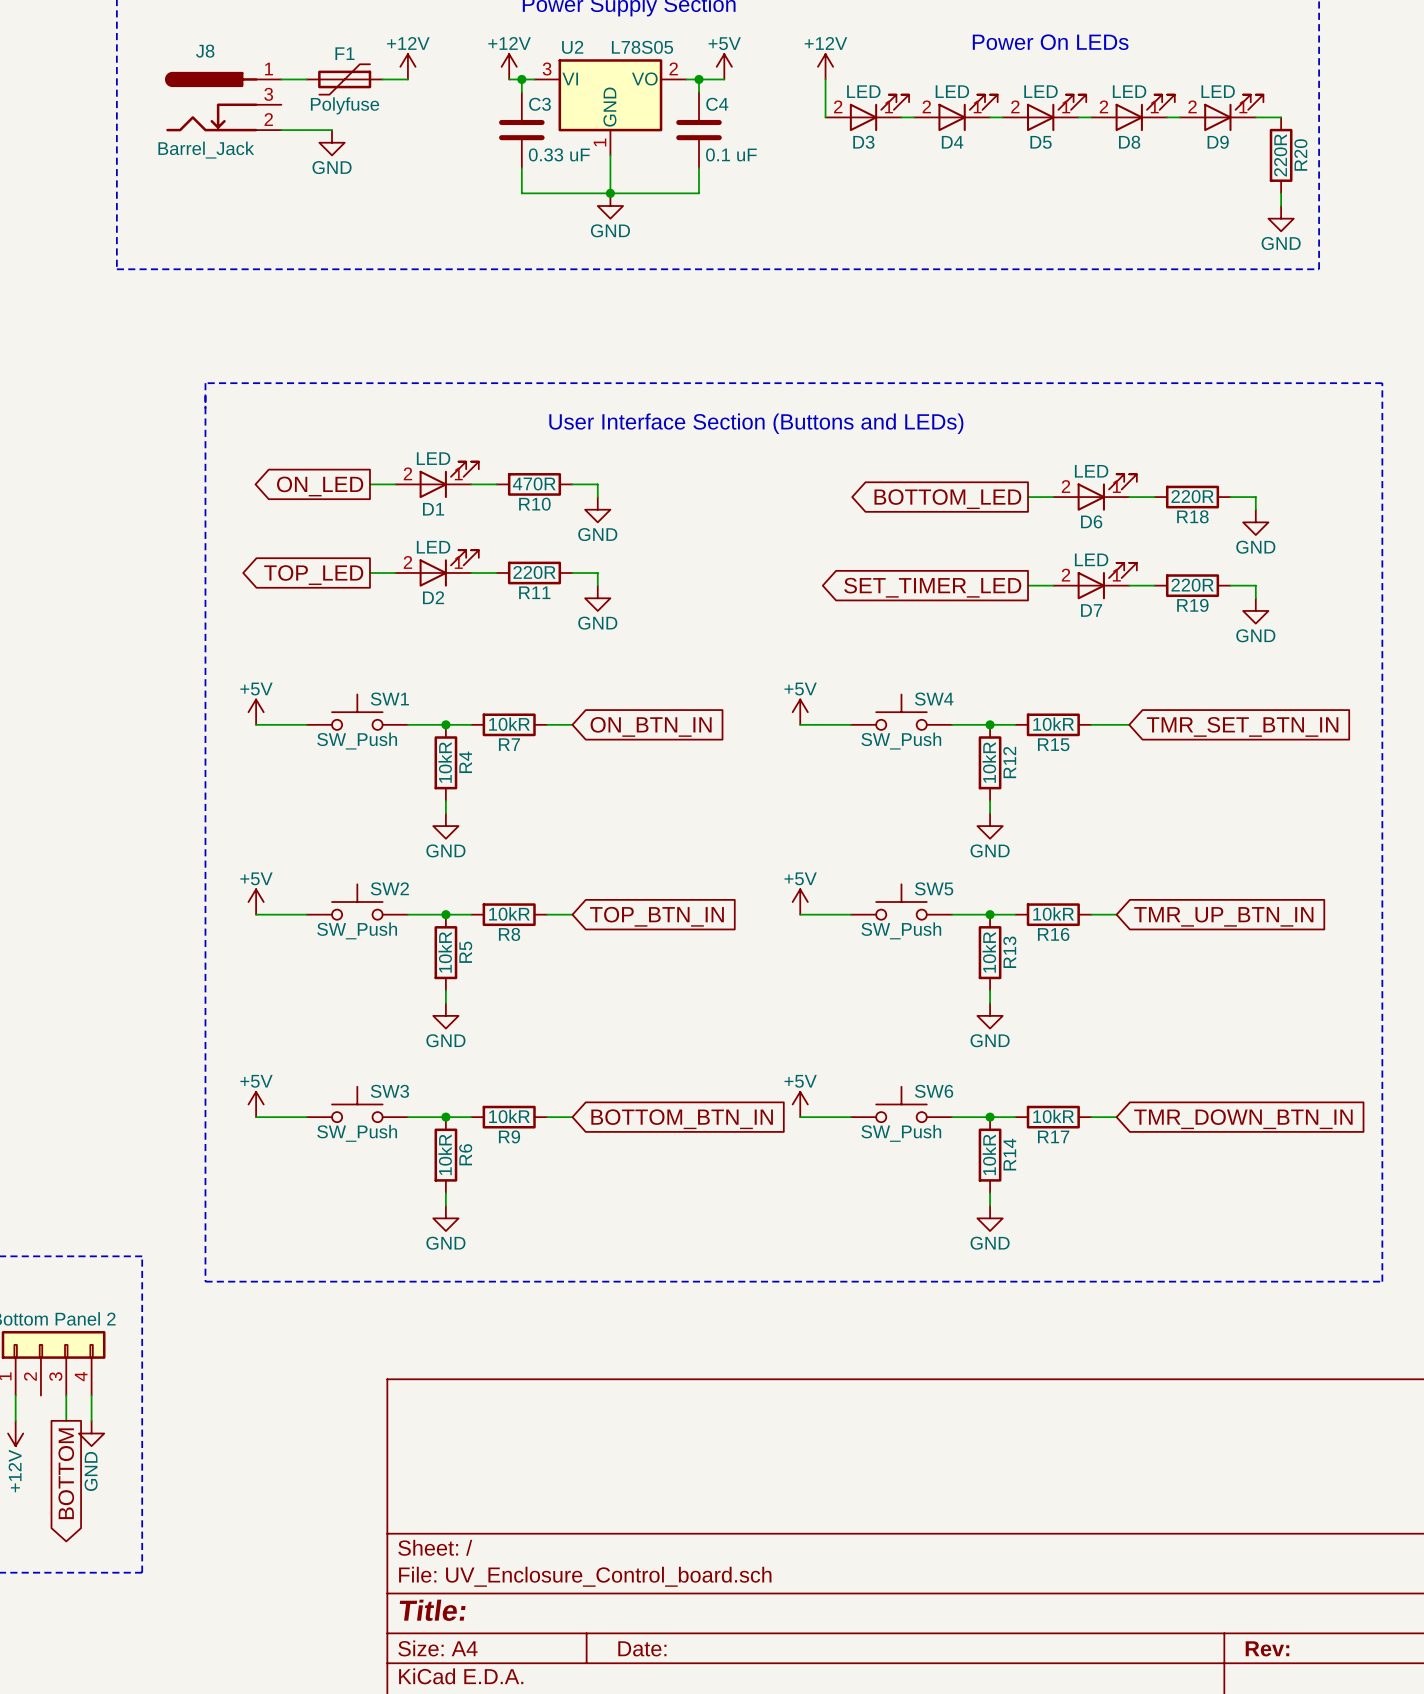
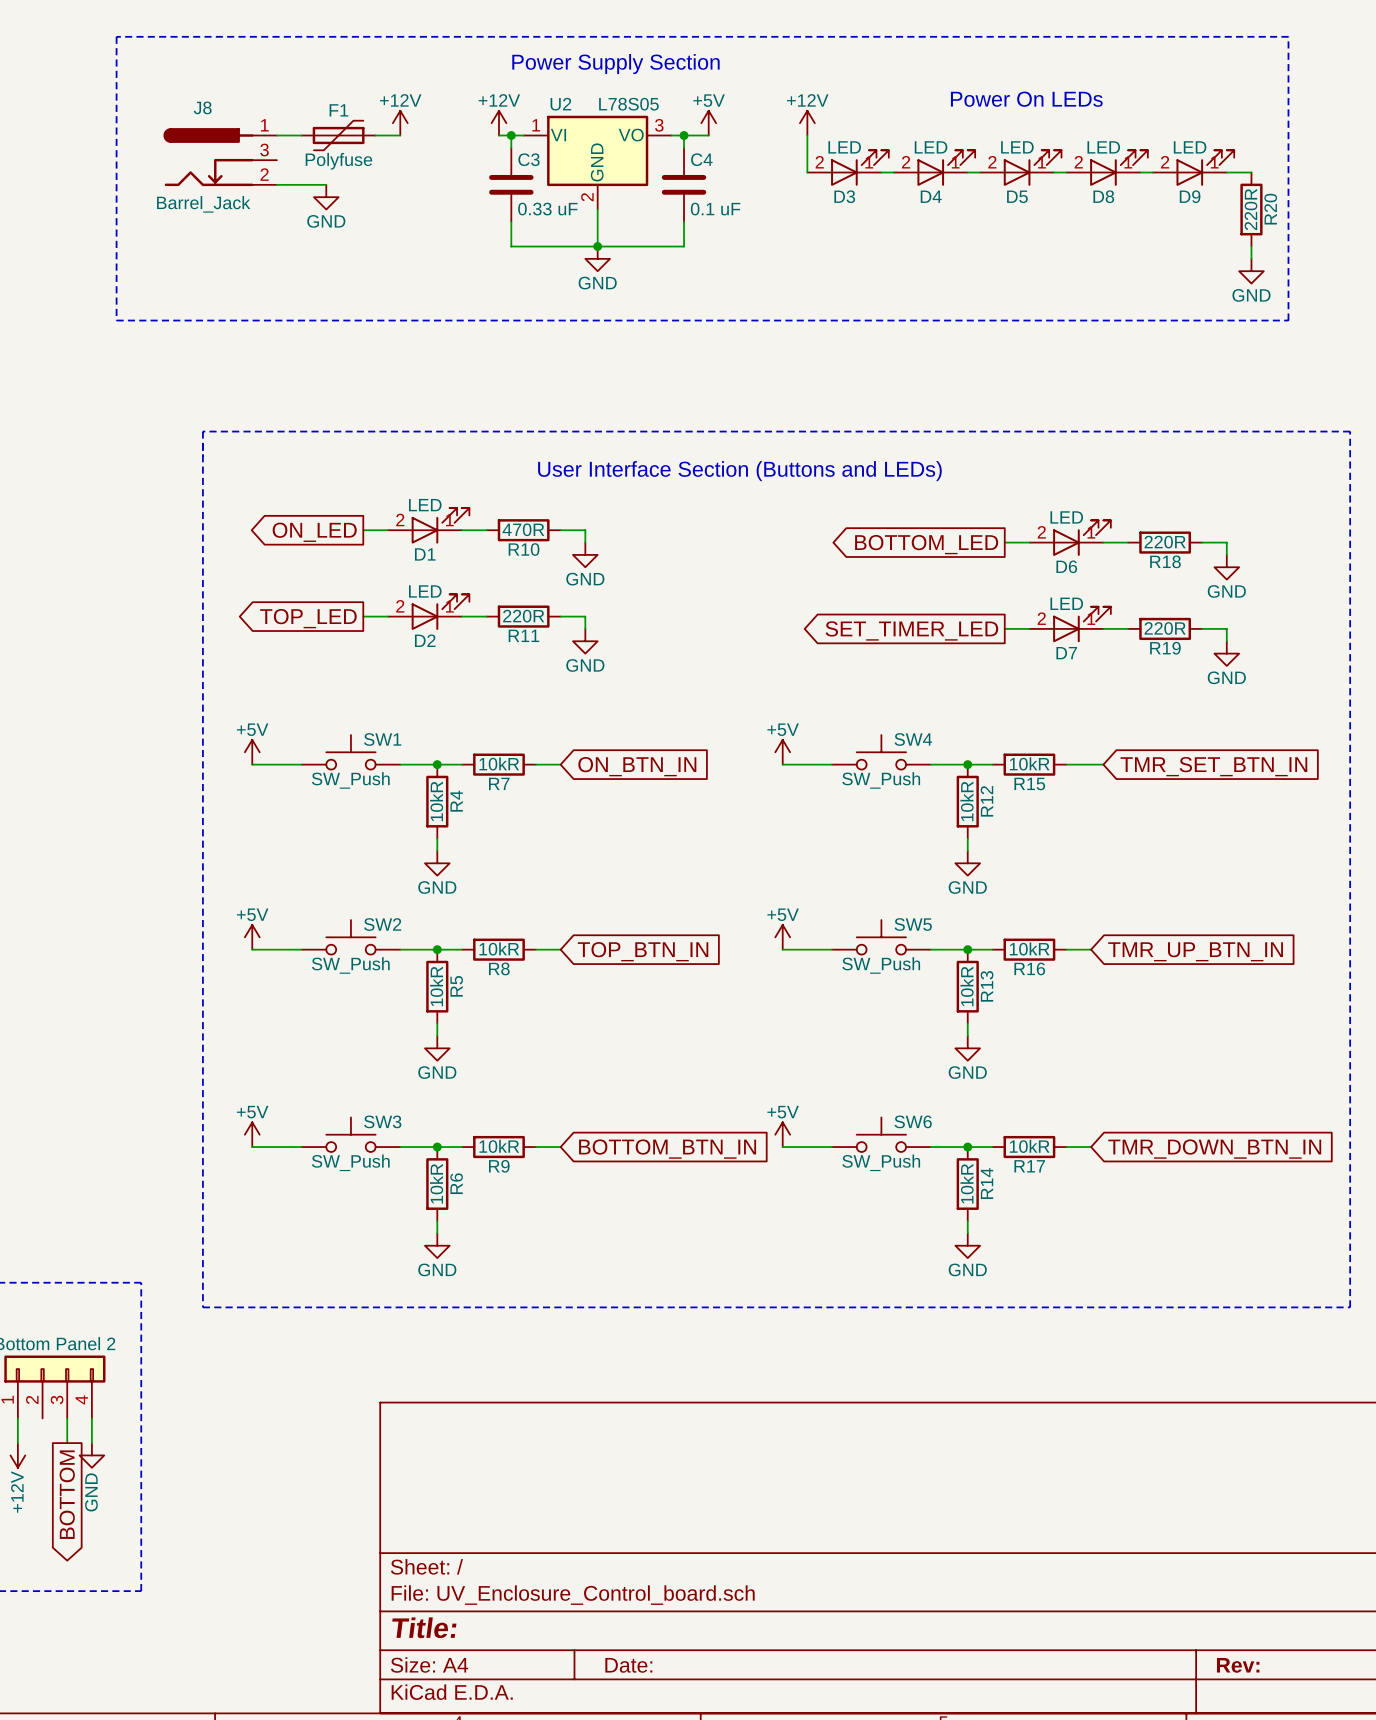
U2 pin number: 2 (673, 68) -> 3 (659, 125)
U2 pin number: 3 (547, 69) -> 1 (536, 125)
U2 pin number: 1 (599, 142) -> 2 (587, 197)

